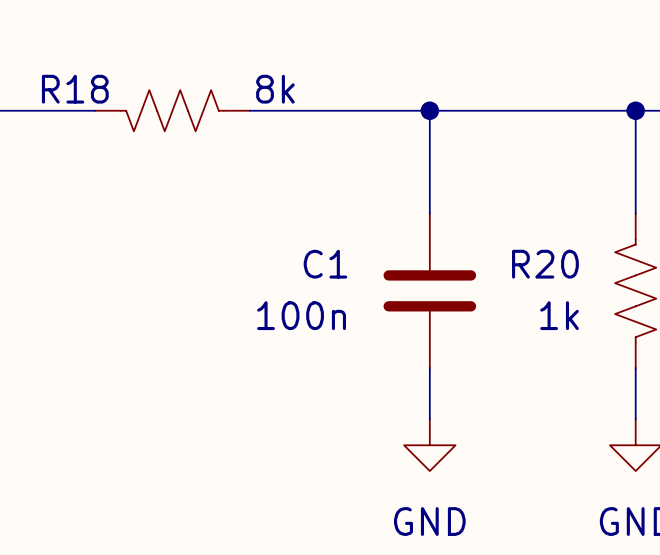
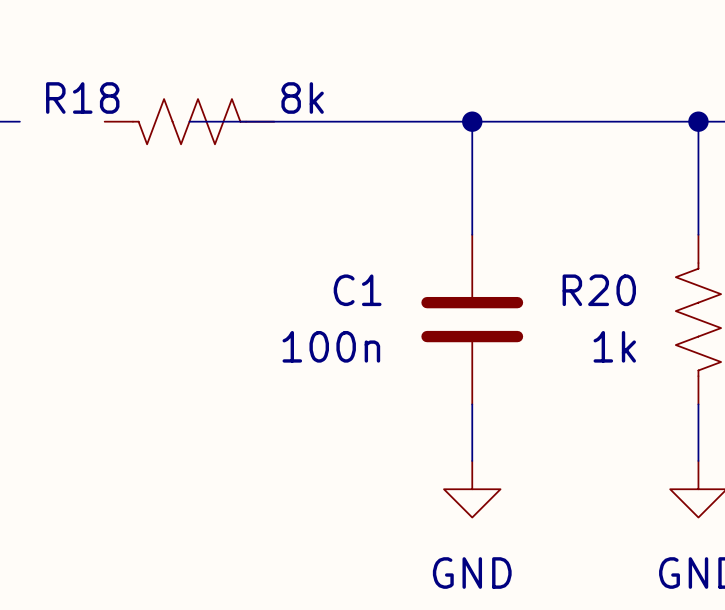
wire: (18, 110) (95, 110) -> (189, 121) (274, 121)

